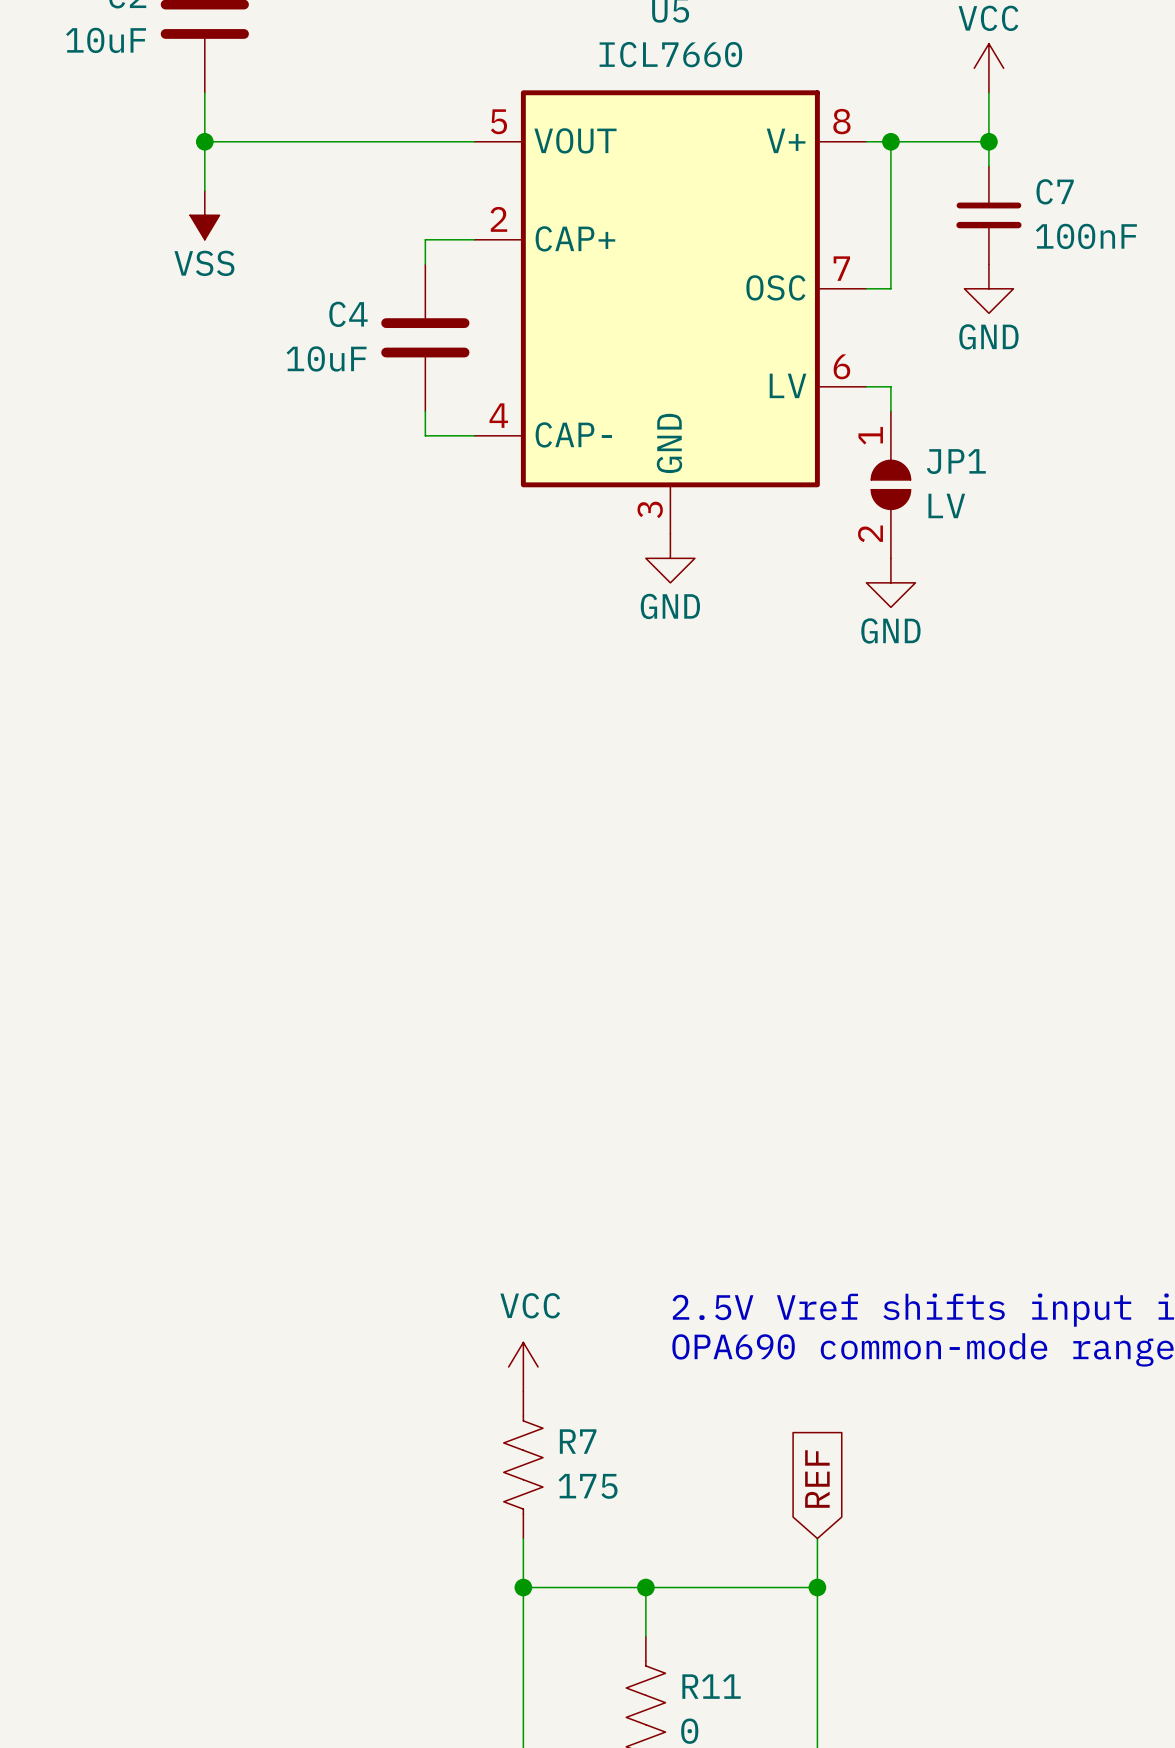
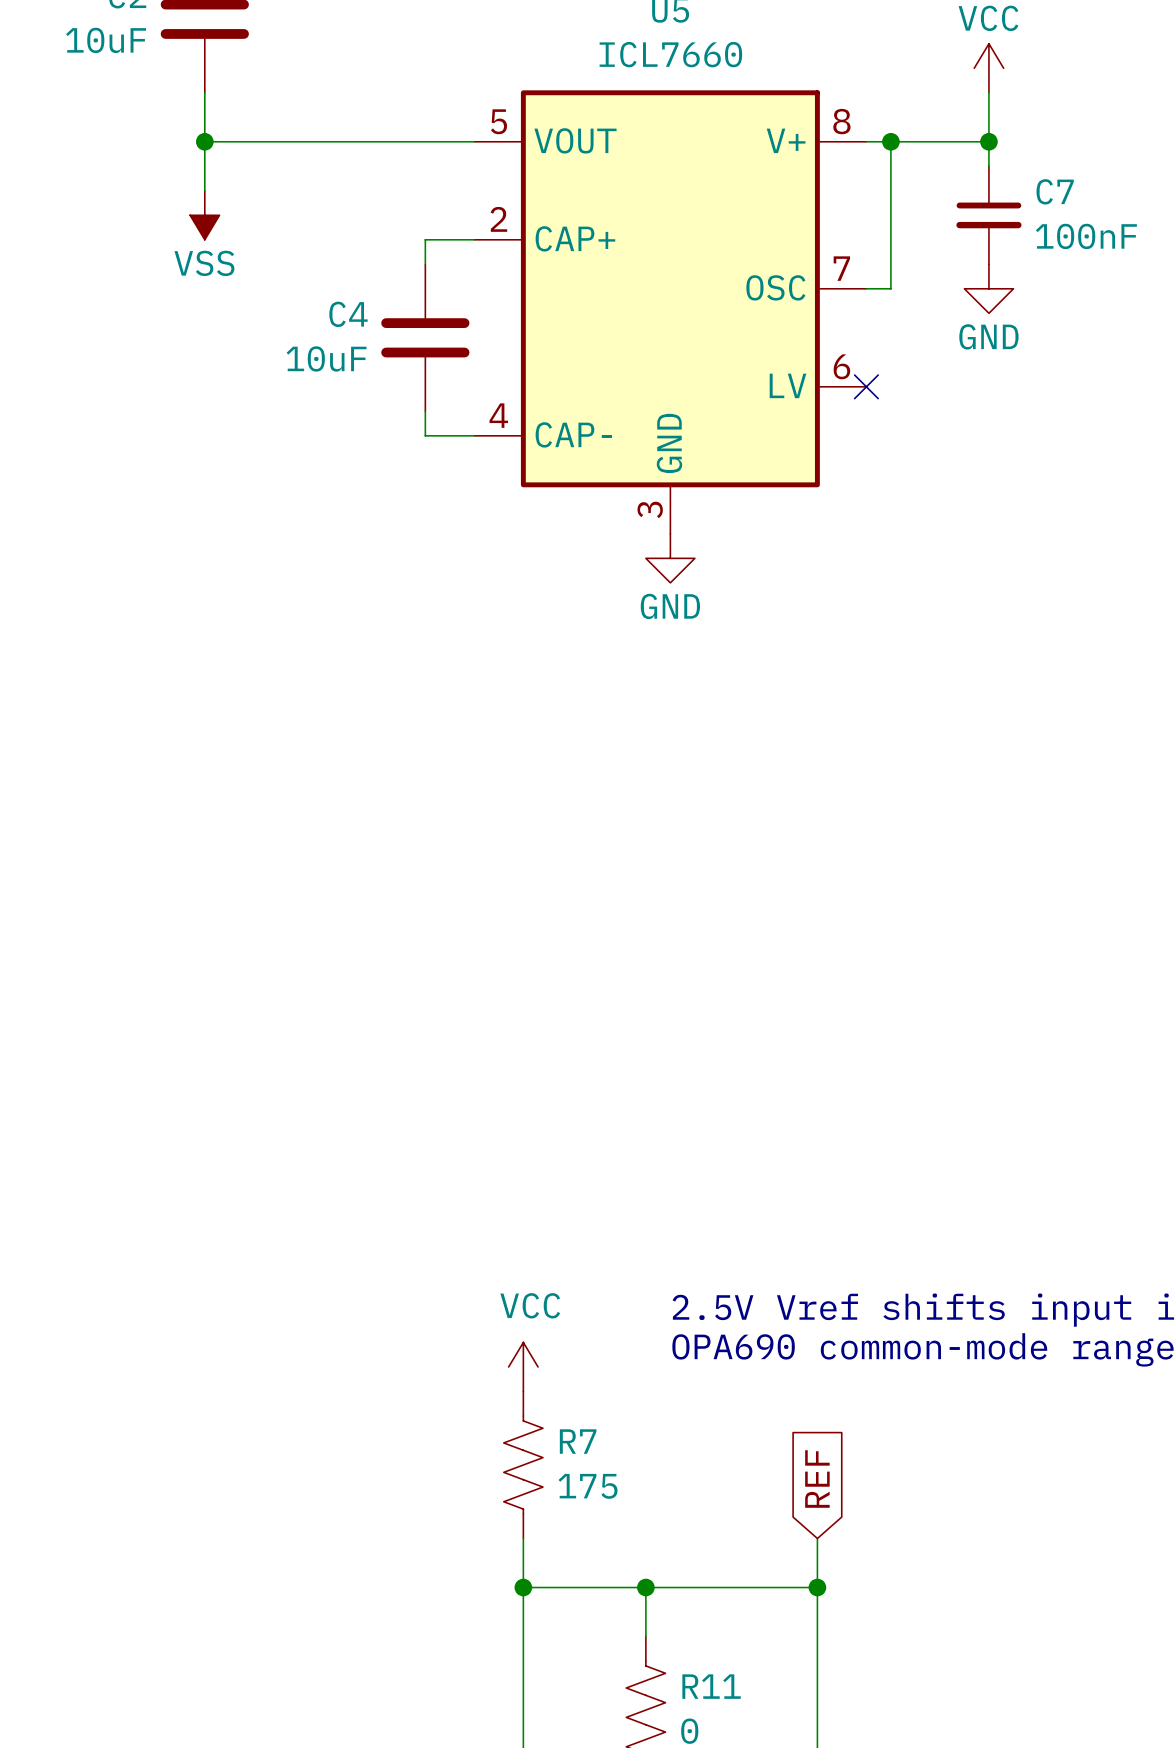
wire: (866, 386) (890, 386) (890, 411) -> none
no-connect mark: none -> (866, 386)
JP1: LV (890, 484) -> none
power symbol: GND (890, 582) -> none

